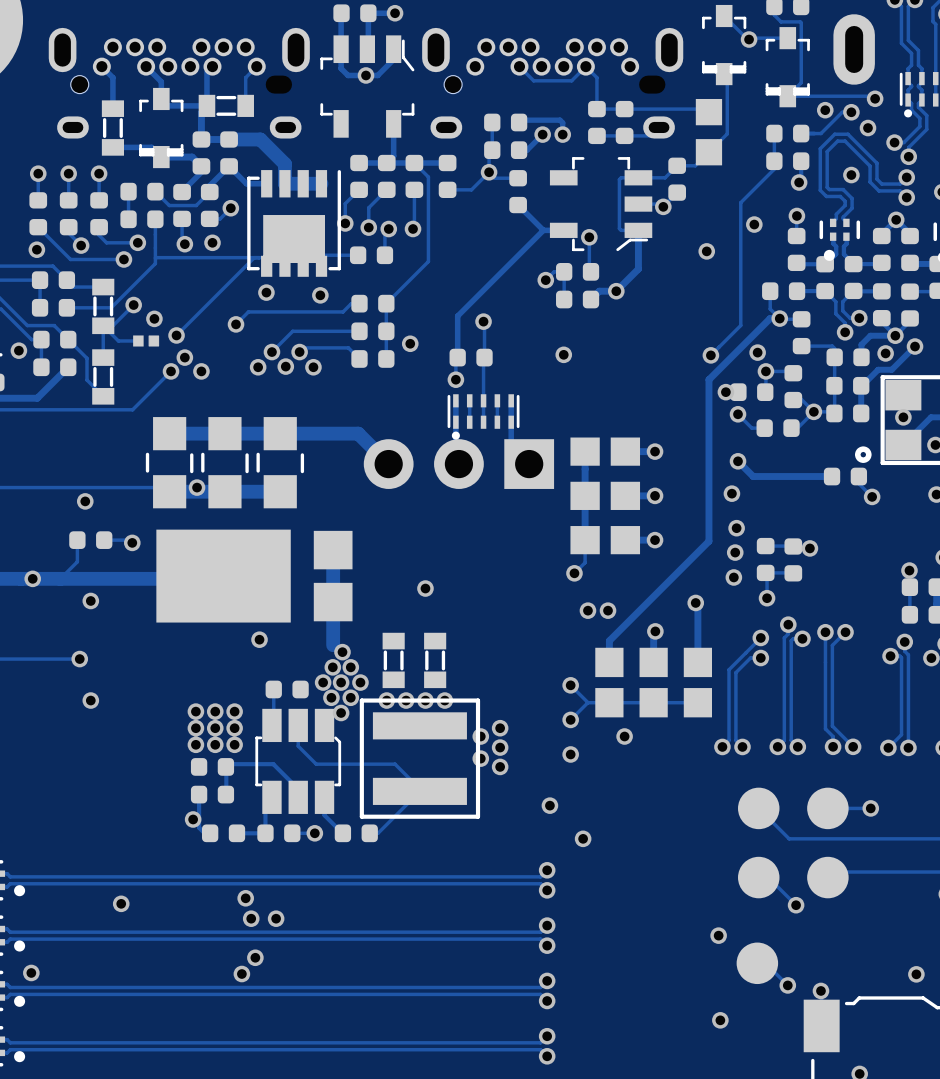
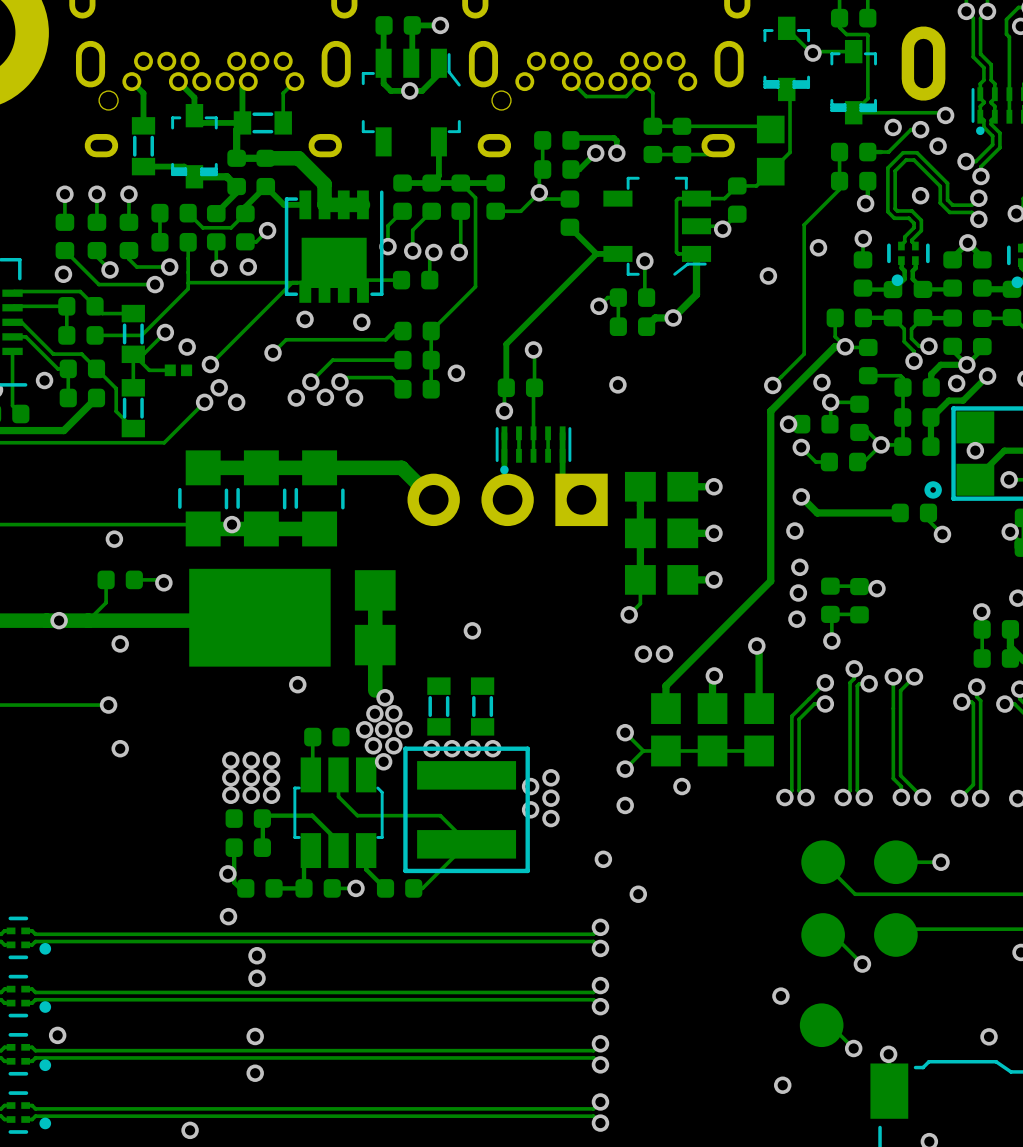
via: none -> (228, 916)
via: none -> (257, 955)
via: (245, 898) -> none
via: (121, 903) -> none
via: none -> (257, 978)
via: (251, 918) -> none
via: (276, 918) -> none
via: (255, 957) -> none
via: none -> (255, 1036)
via: (241, 974) -> none
via: none -> (255, 1073)
via: none -> (190, 1130)

